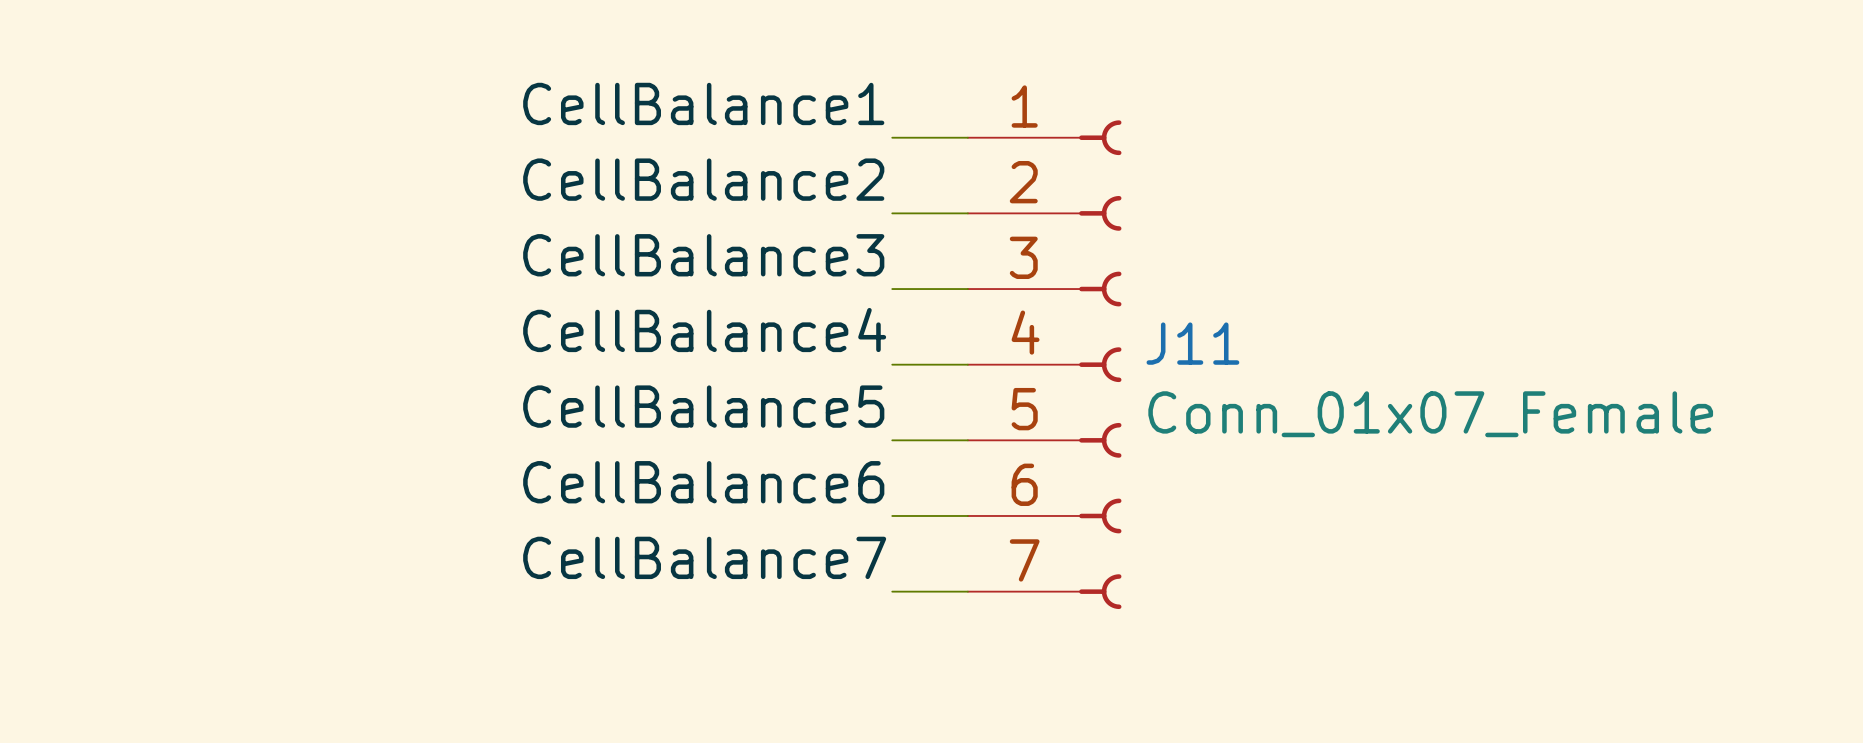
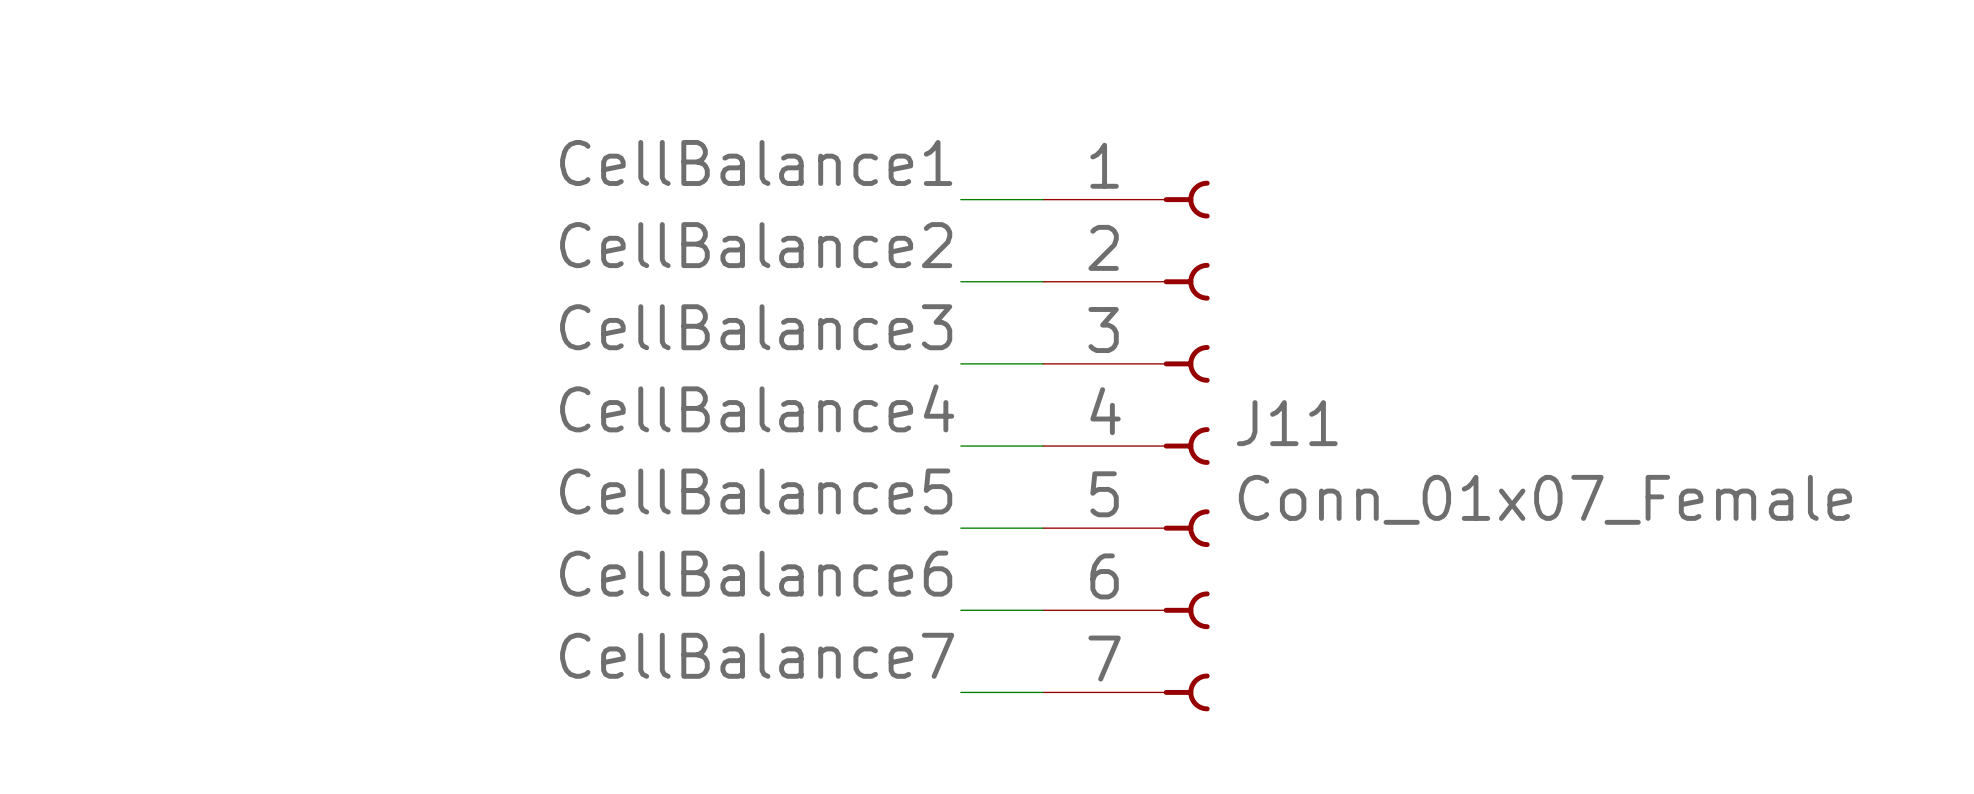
label: CellBalance1 (703, 103) -> none
wire: (892, 137) (967, 137) -> (960, 692) (1042, 692)
label: CellBalance2 (703, 179) -> CellBalance1 (756, 162)
label: CellBalance3 (703, 255) -> CellBalance2 (756, 245)
label: CellBalance4 (704, 330) -> CellBalance3 (756, 327)
J11 position: (1044, 364) -> (1126, 446)
label: CellBalance5 (703, 406) -> CellBalance4 (757, 408)
label: CellBalance6 (703, 482) -> CellBalance5 (756, 491)
label: CellBalance7 (704, 557) -> CellBalance6 (756, 573)
label: none -> CellBalance7 (757, 655)

